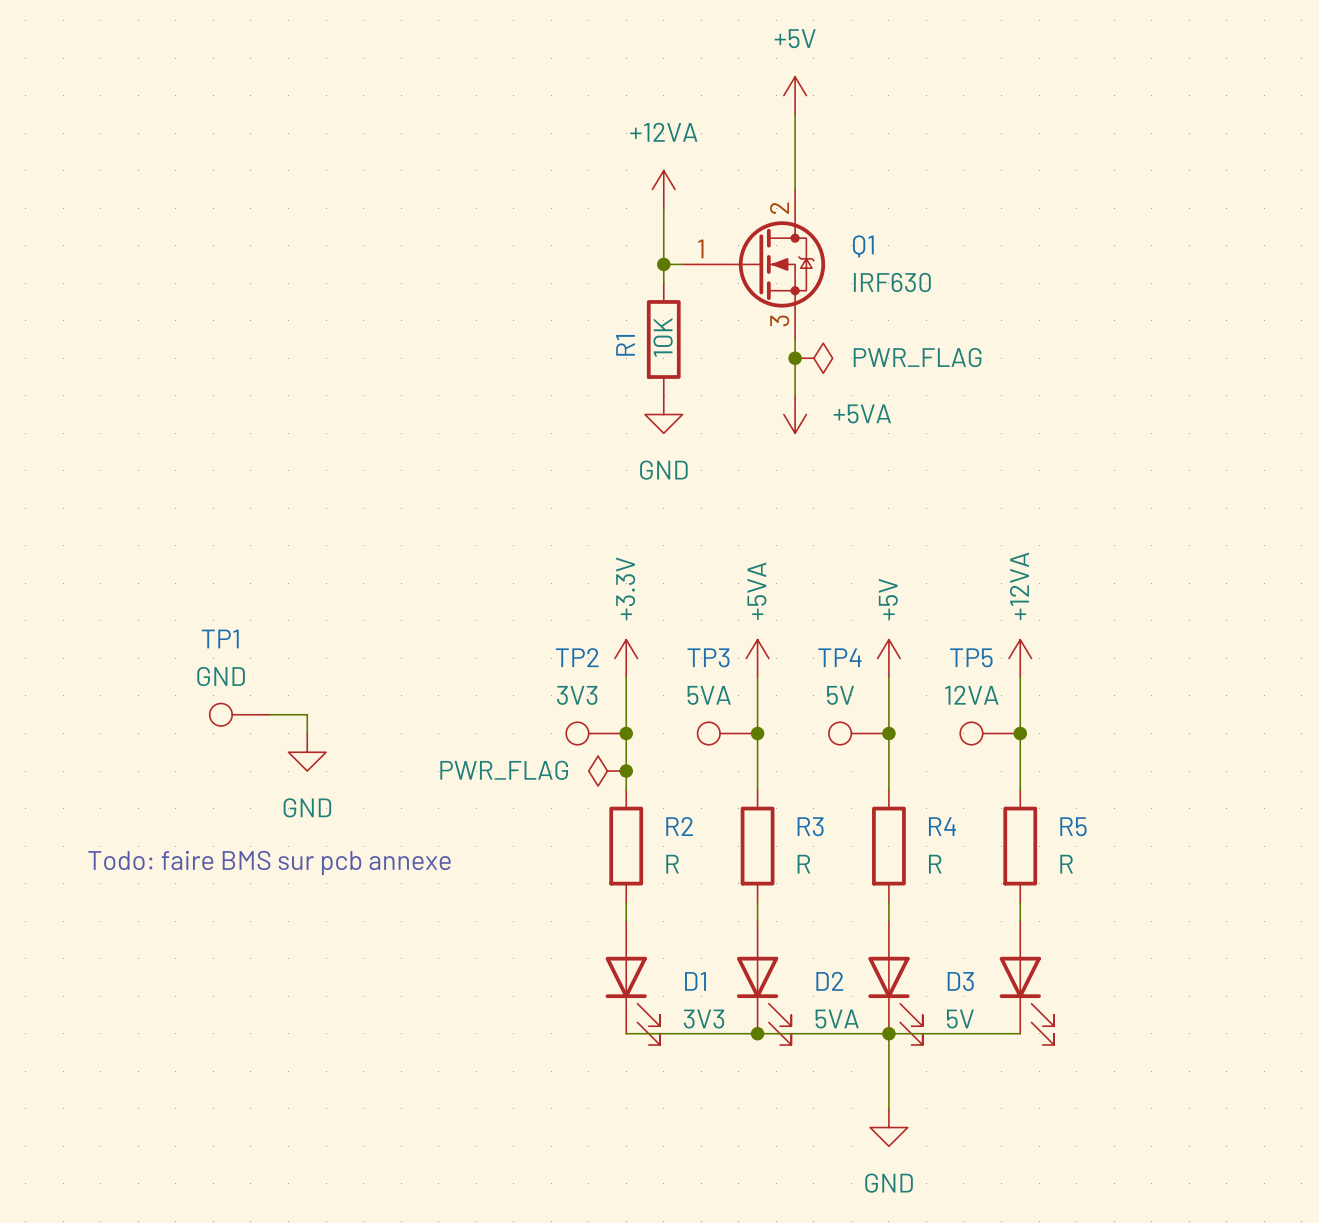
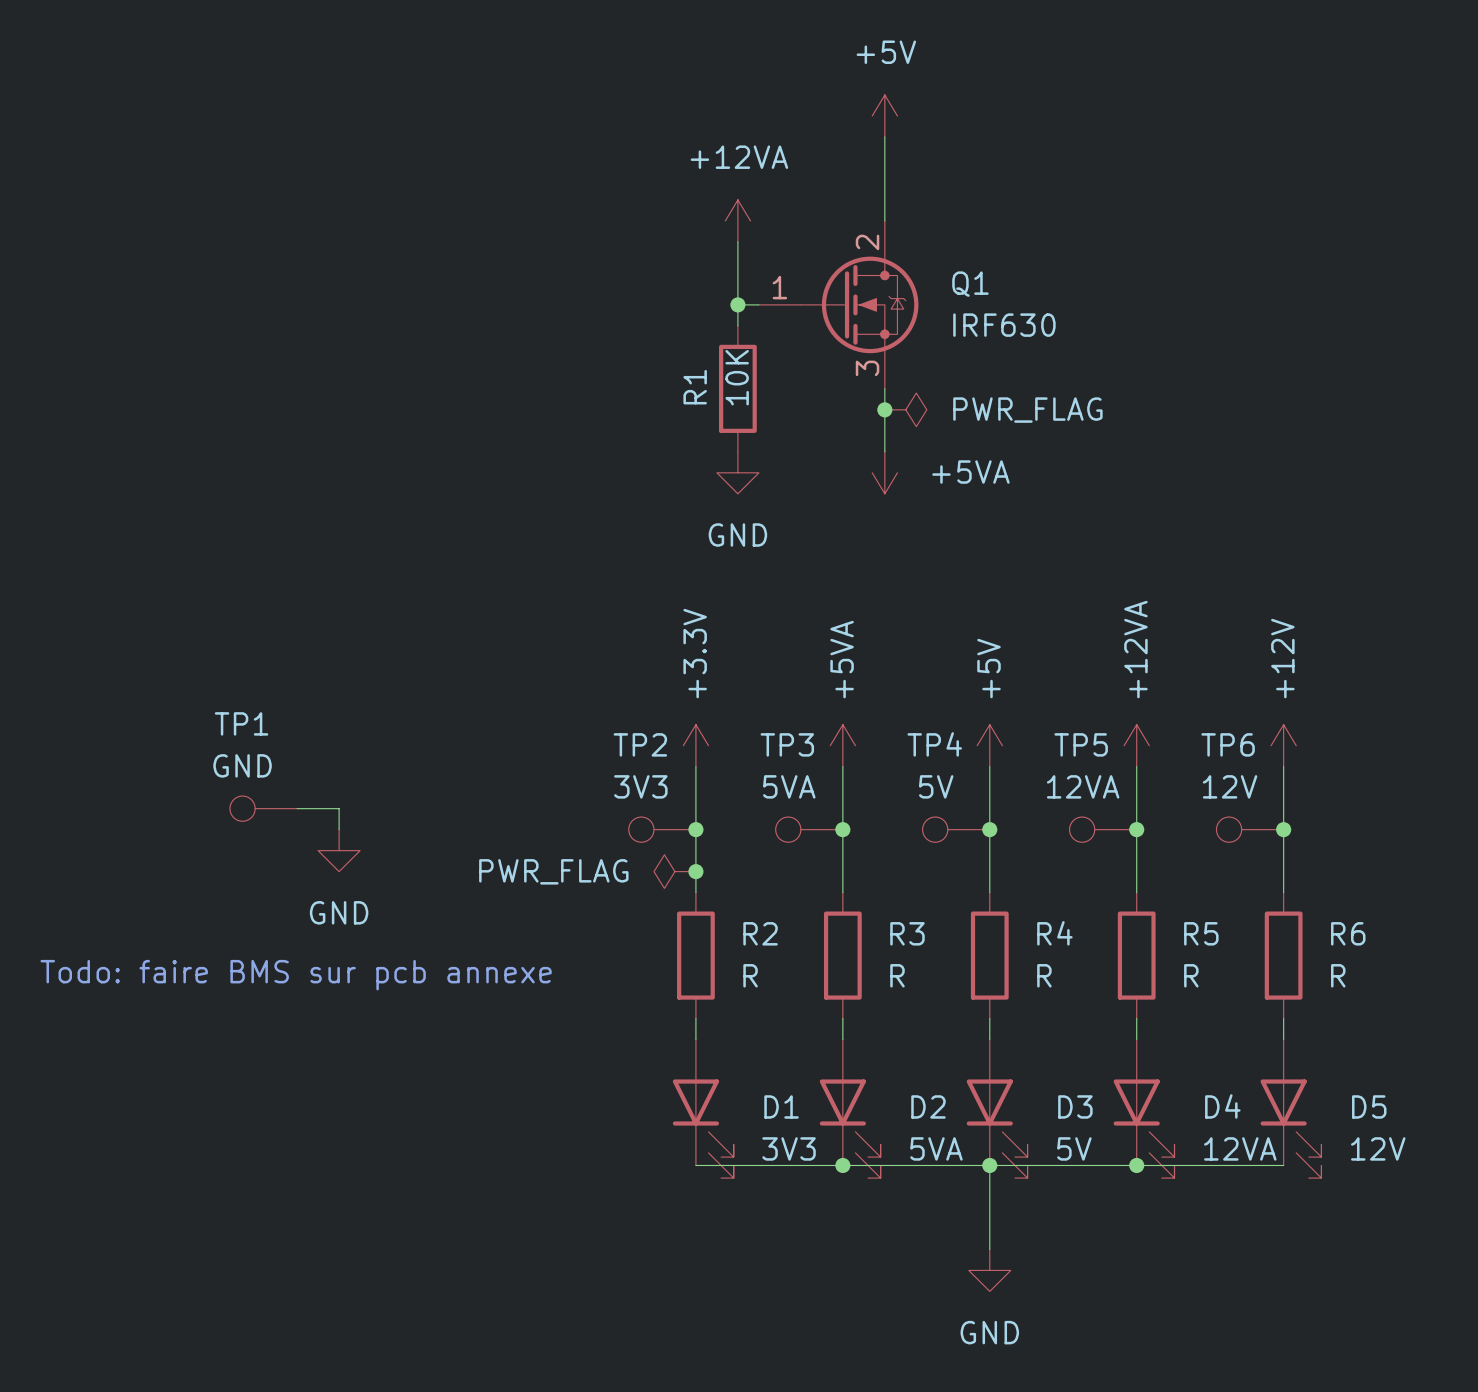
power symbol: none -> +12V (1283, 745)
wire: none -> (1283, 766) (1283, 892)
TP6: none -> 12V (1250, 829)
junction: none -> (1283, 829)
R6: none -> R (1283, 955)
wire: none -> (1283, 1018) (1283, 1039)
D4 name: none -> D4 (1222, 1106)
D5: none -> 12V (1290, 1108)
D4 value: none -> 12VA (1240, 1148)
wire: none -> (1136, 1165) (1283, 1165)
junction: none -> (1136, 1165)

